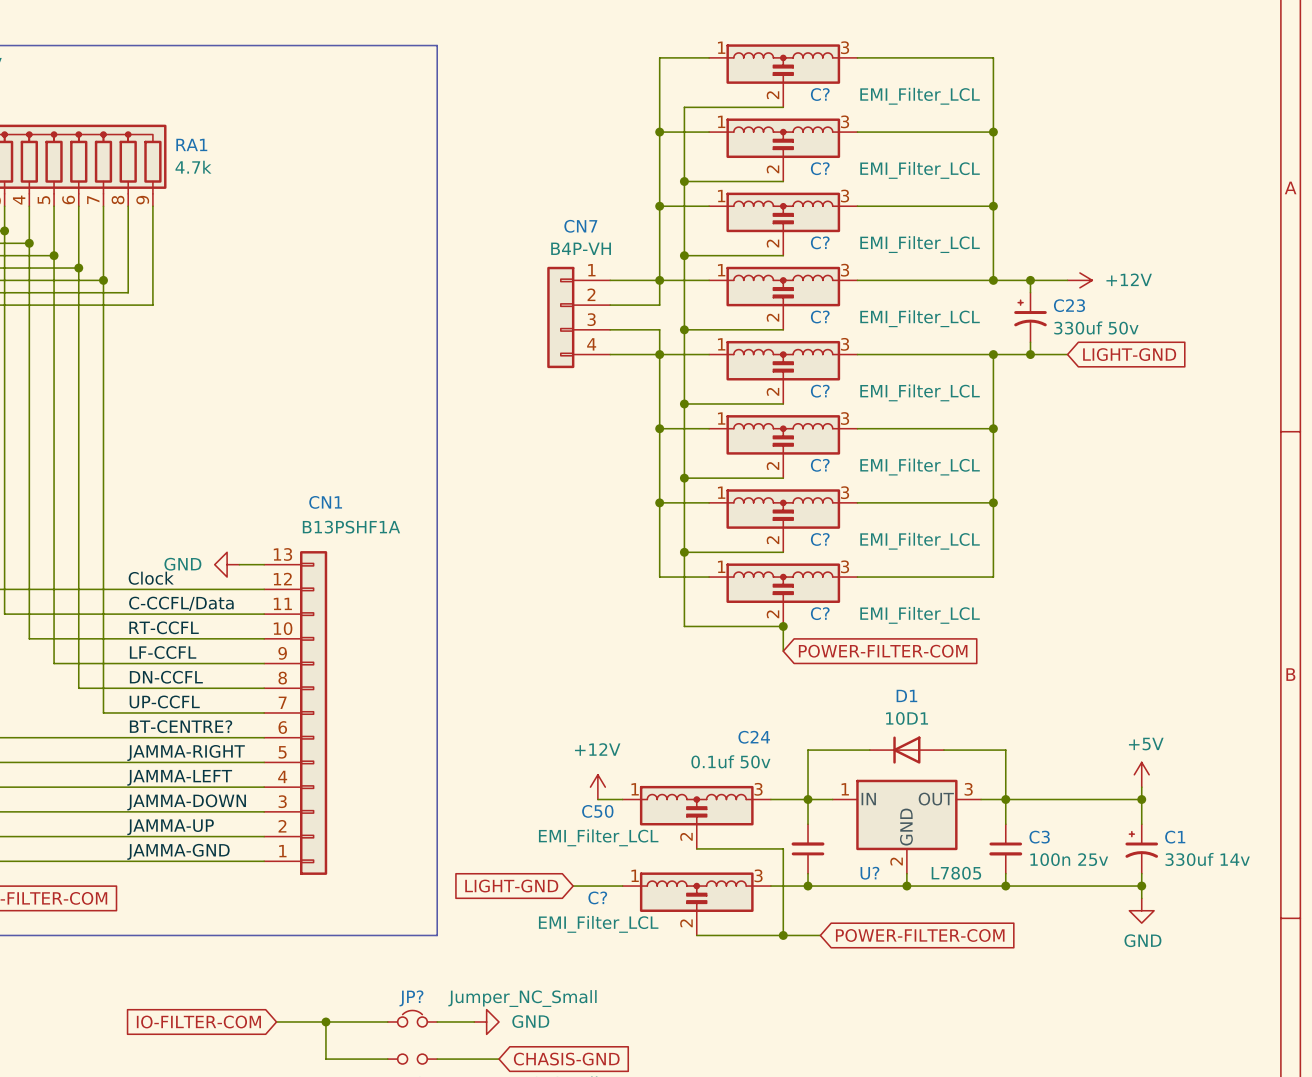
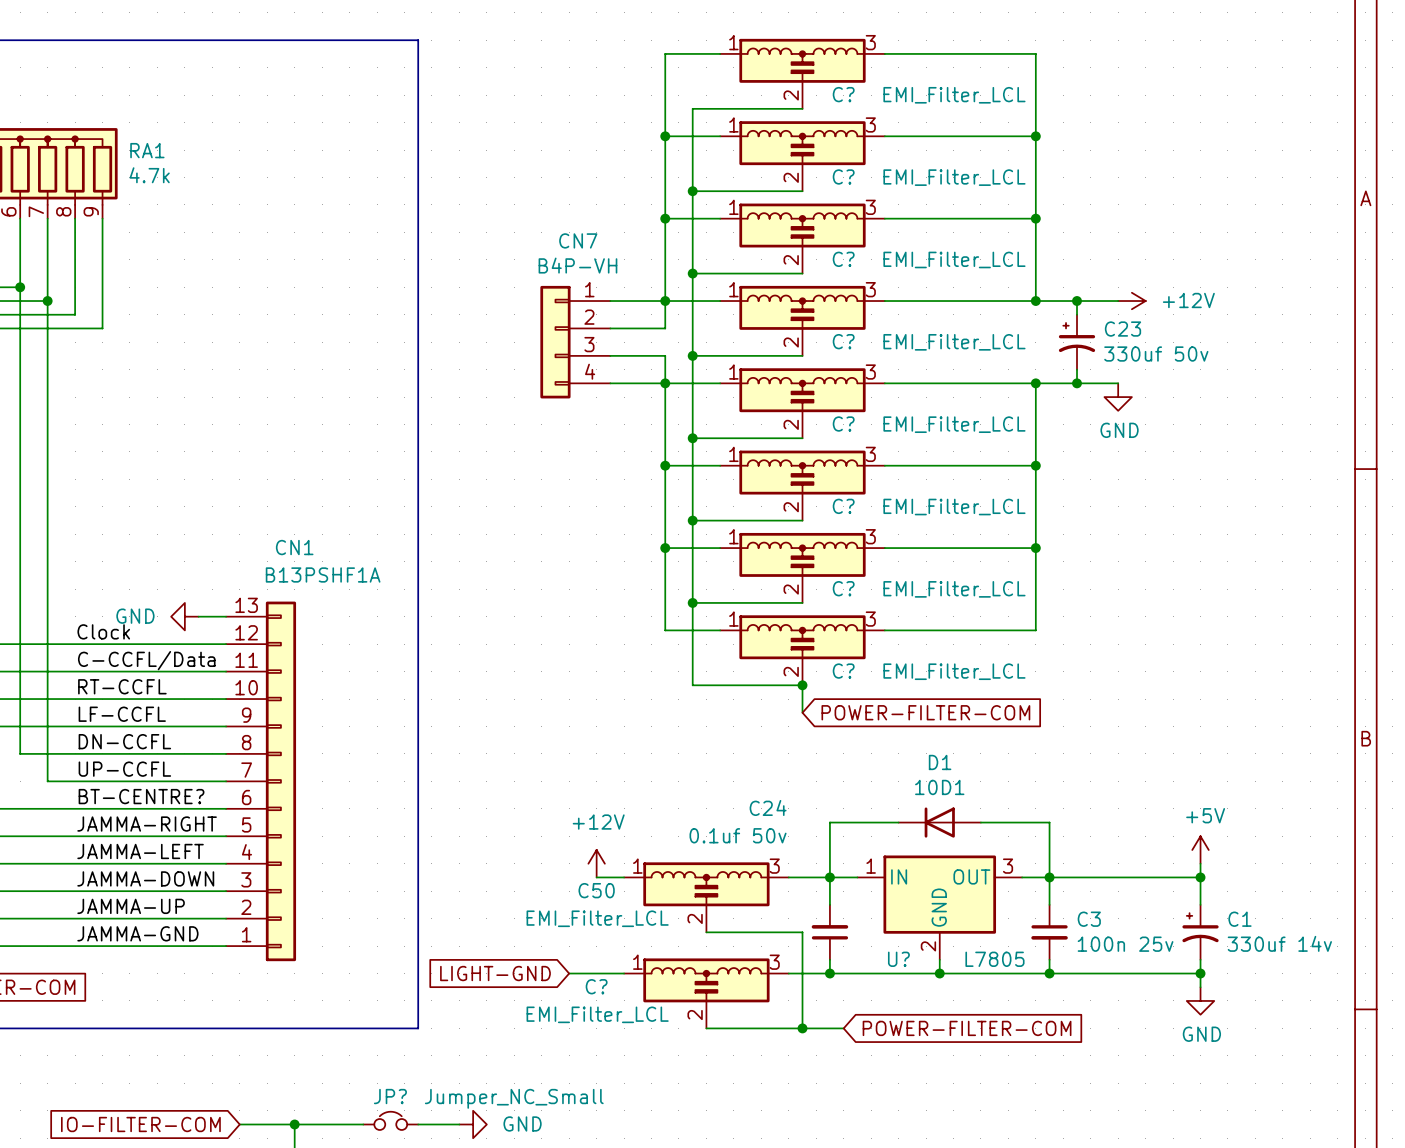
global label: LIGHT-GND (1129, 354) -> none
power symbol: none -> GND (1118, 397)

